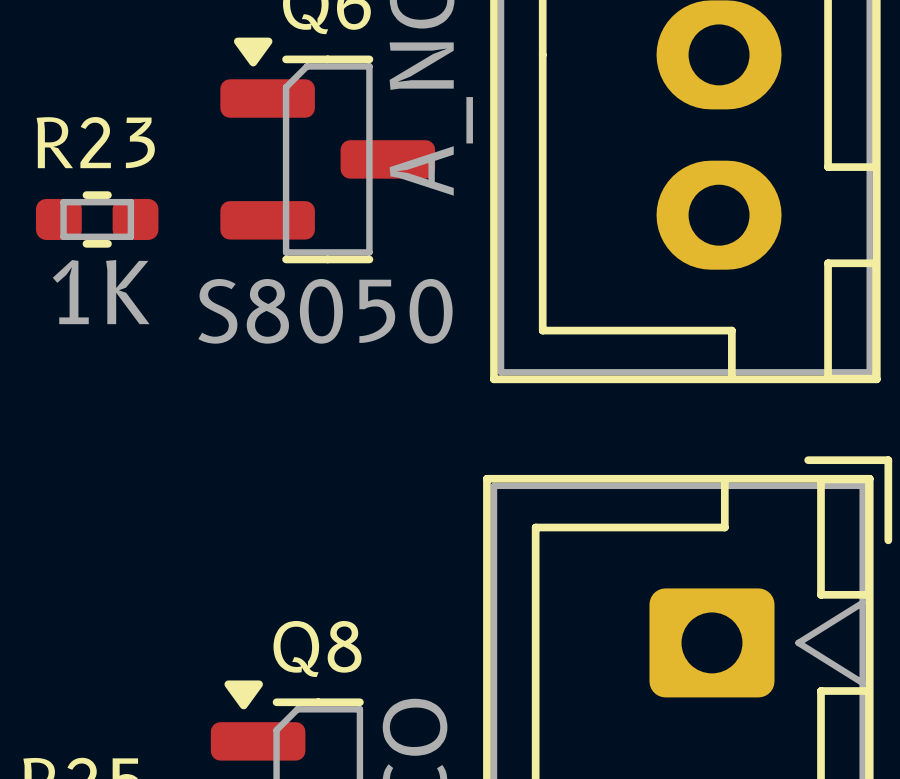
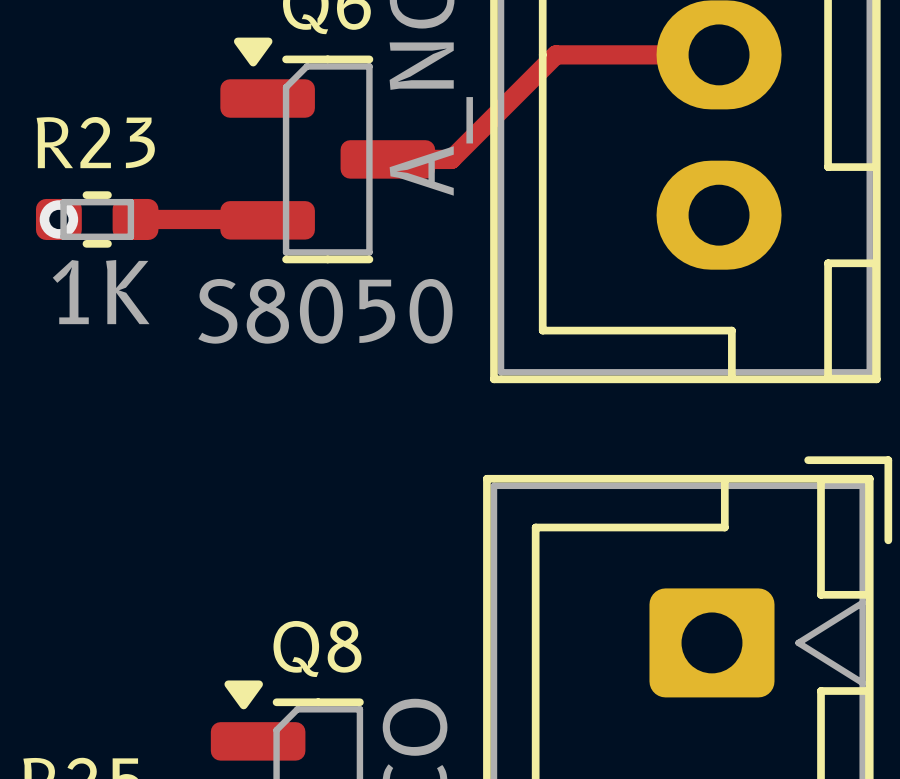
track: none -> (719, 54) (555, 54) (451, 159) (387, 159)
via: none -> (58, 219)
track: none -> (135, 219) (266, 219)

